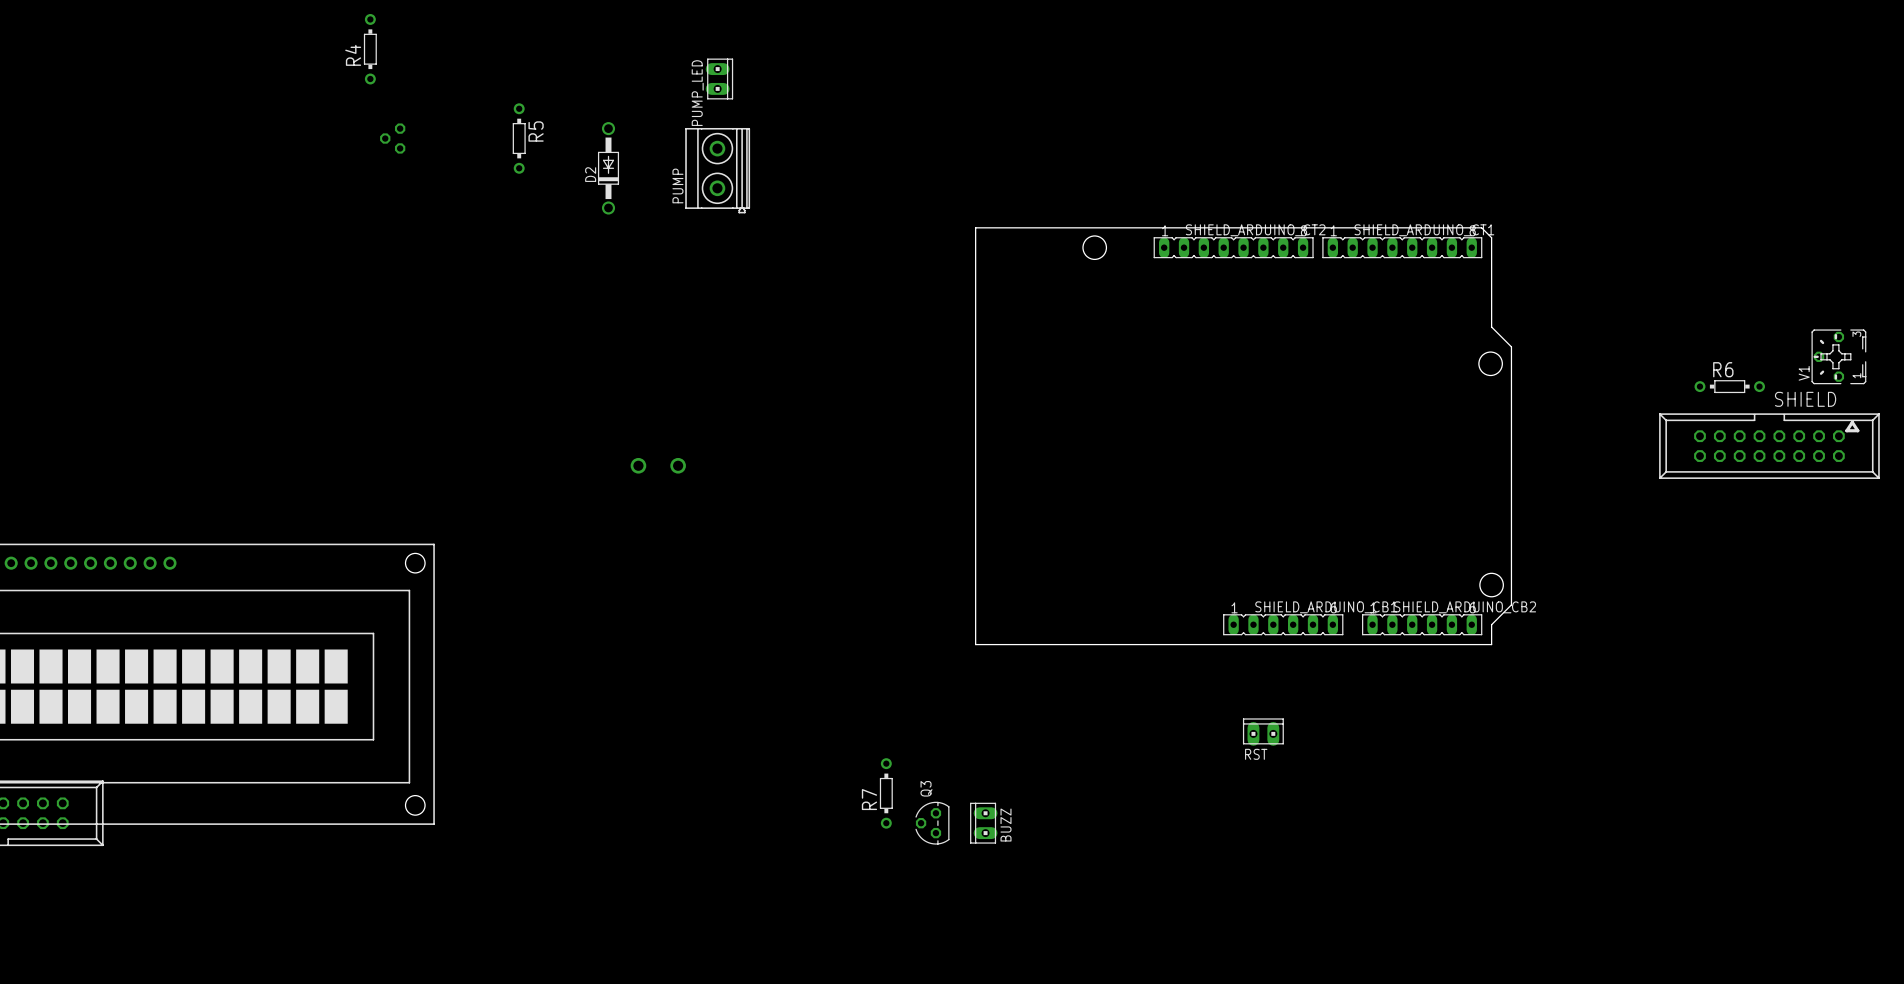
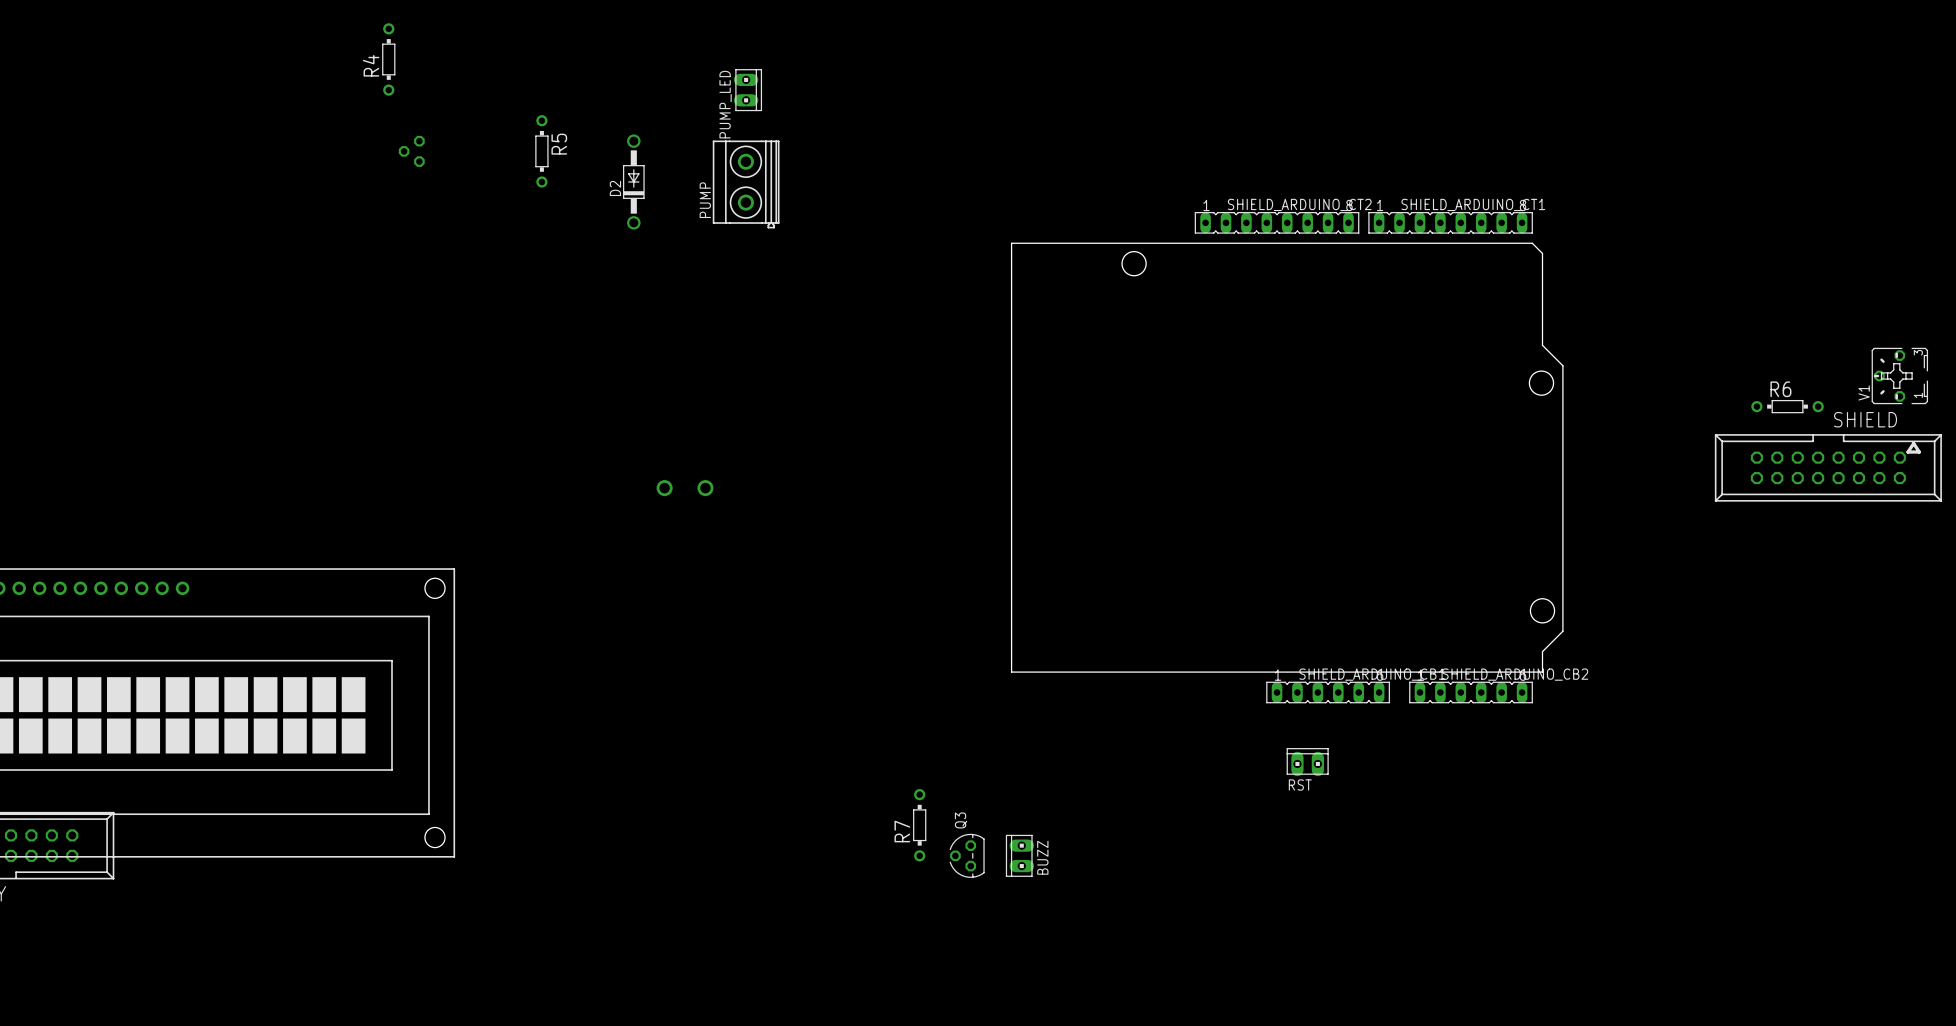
SHIELD_ARDUINO_CT2 position: (1233, 247) -> (1277, 222)
SHIELD_ARDUINO_CT1 position: (1402, 247) -> (1450, 222)
SHIELD_ARDUINO_CB1 position: (1283, 624) -> (1328, 692)
SHIELD_ARDUINO_CB2 position: (1422, 624) -> (1471, 692)

